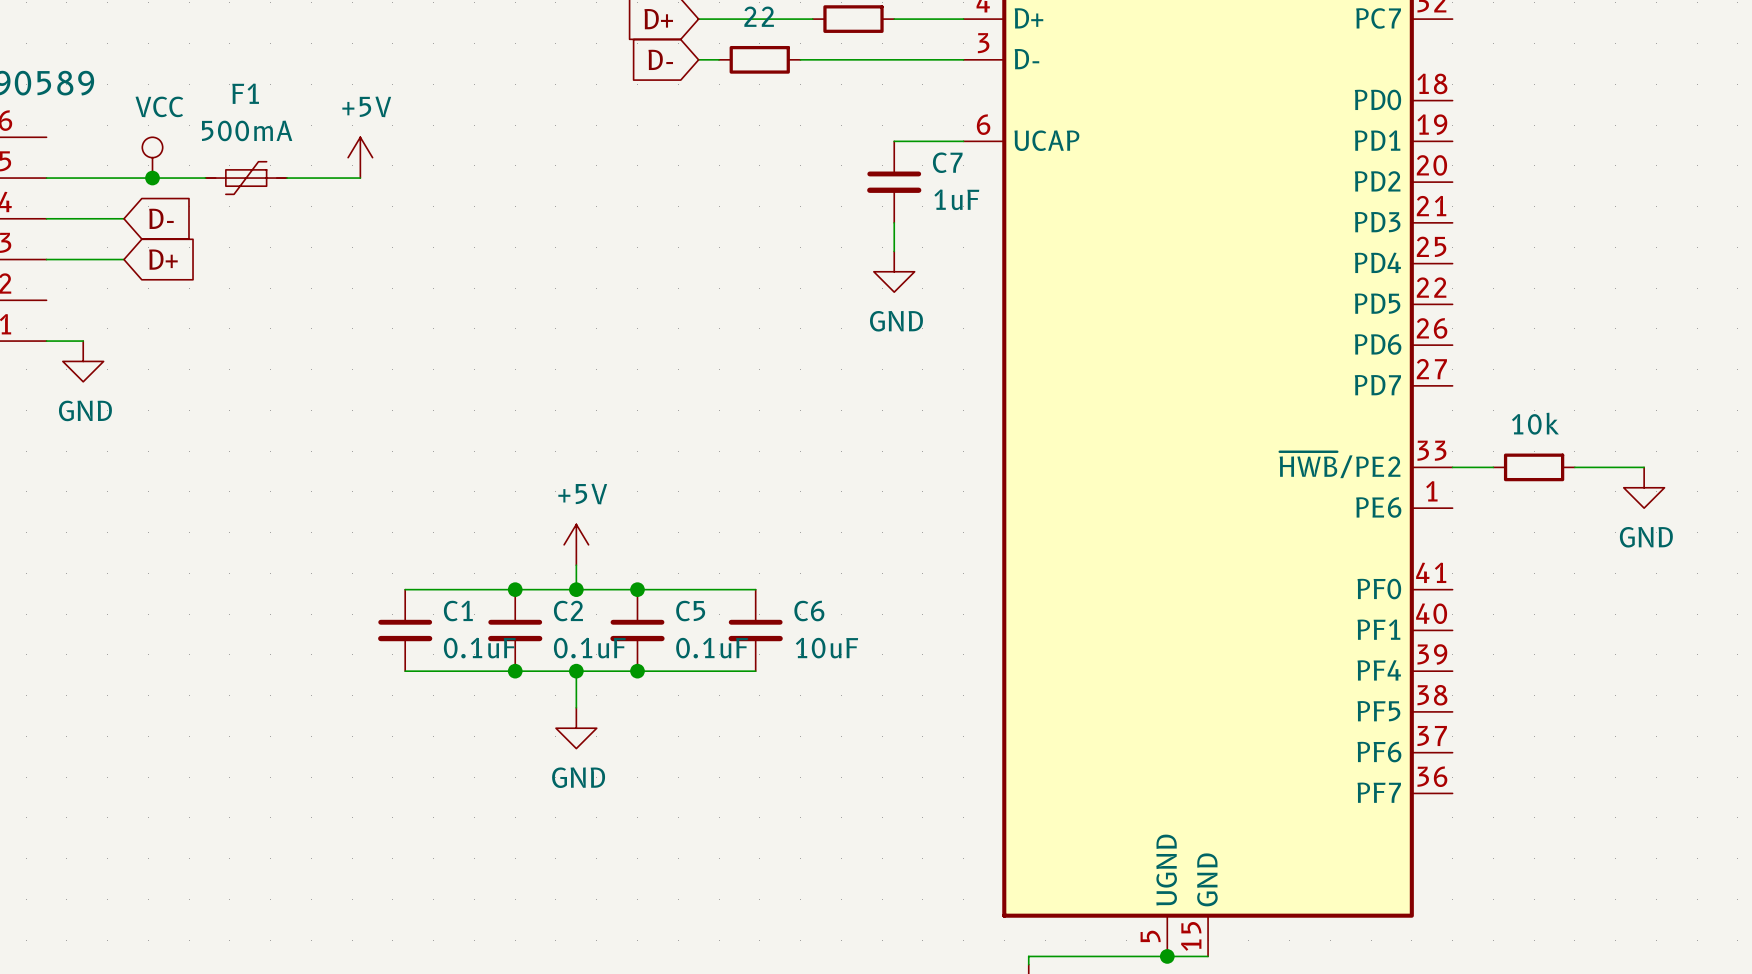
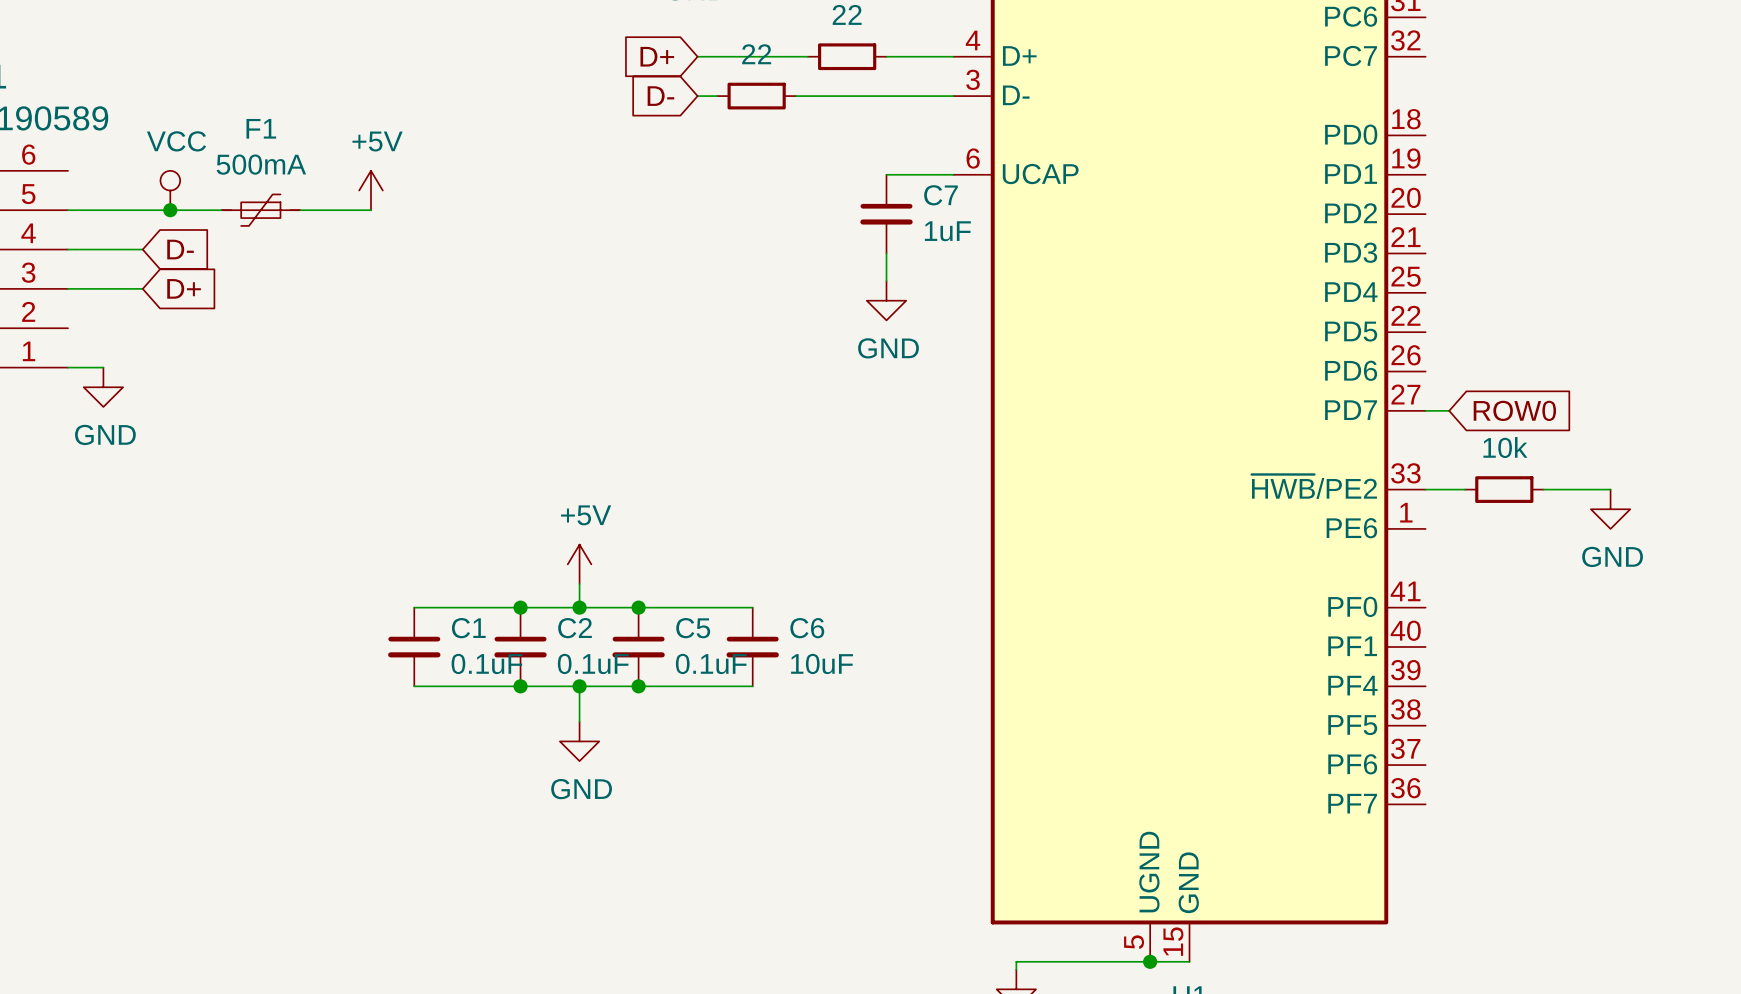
wire: none -> (1425, 410) (1449, 410)
global label: none -> ROW0 (1514, 410)

